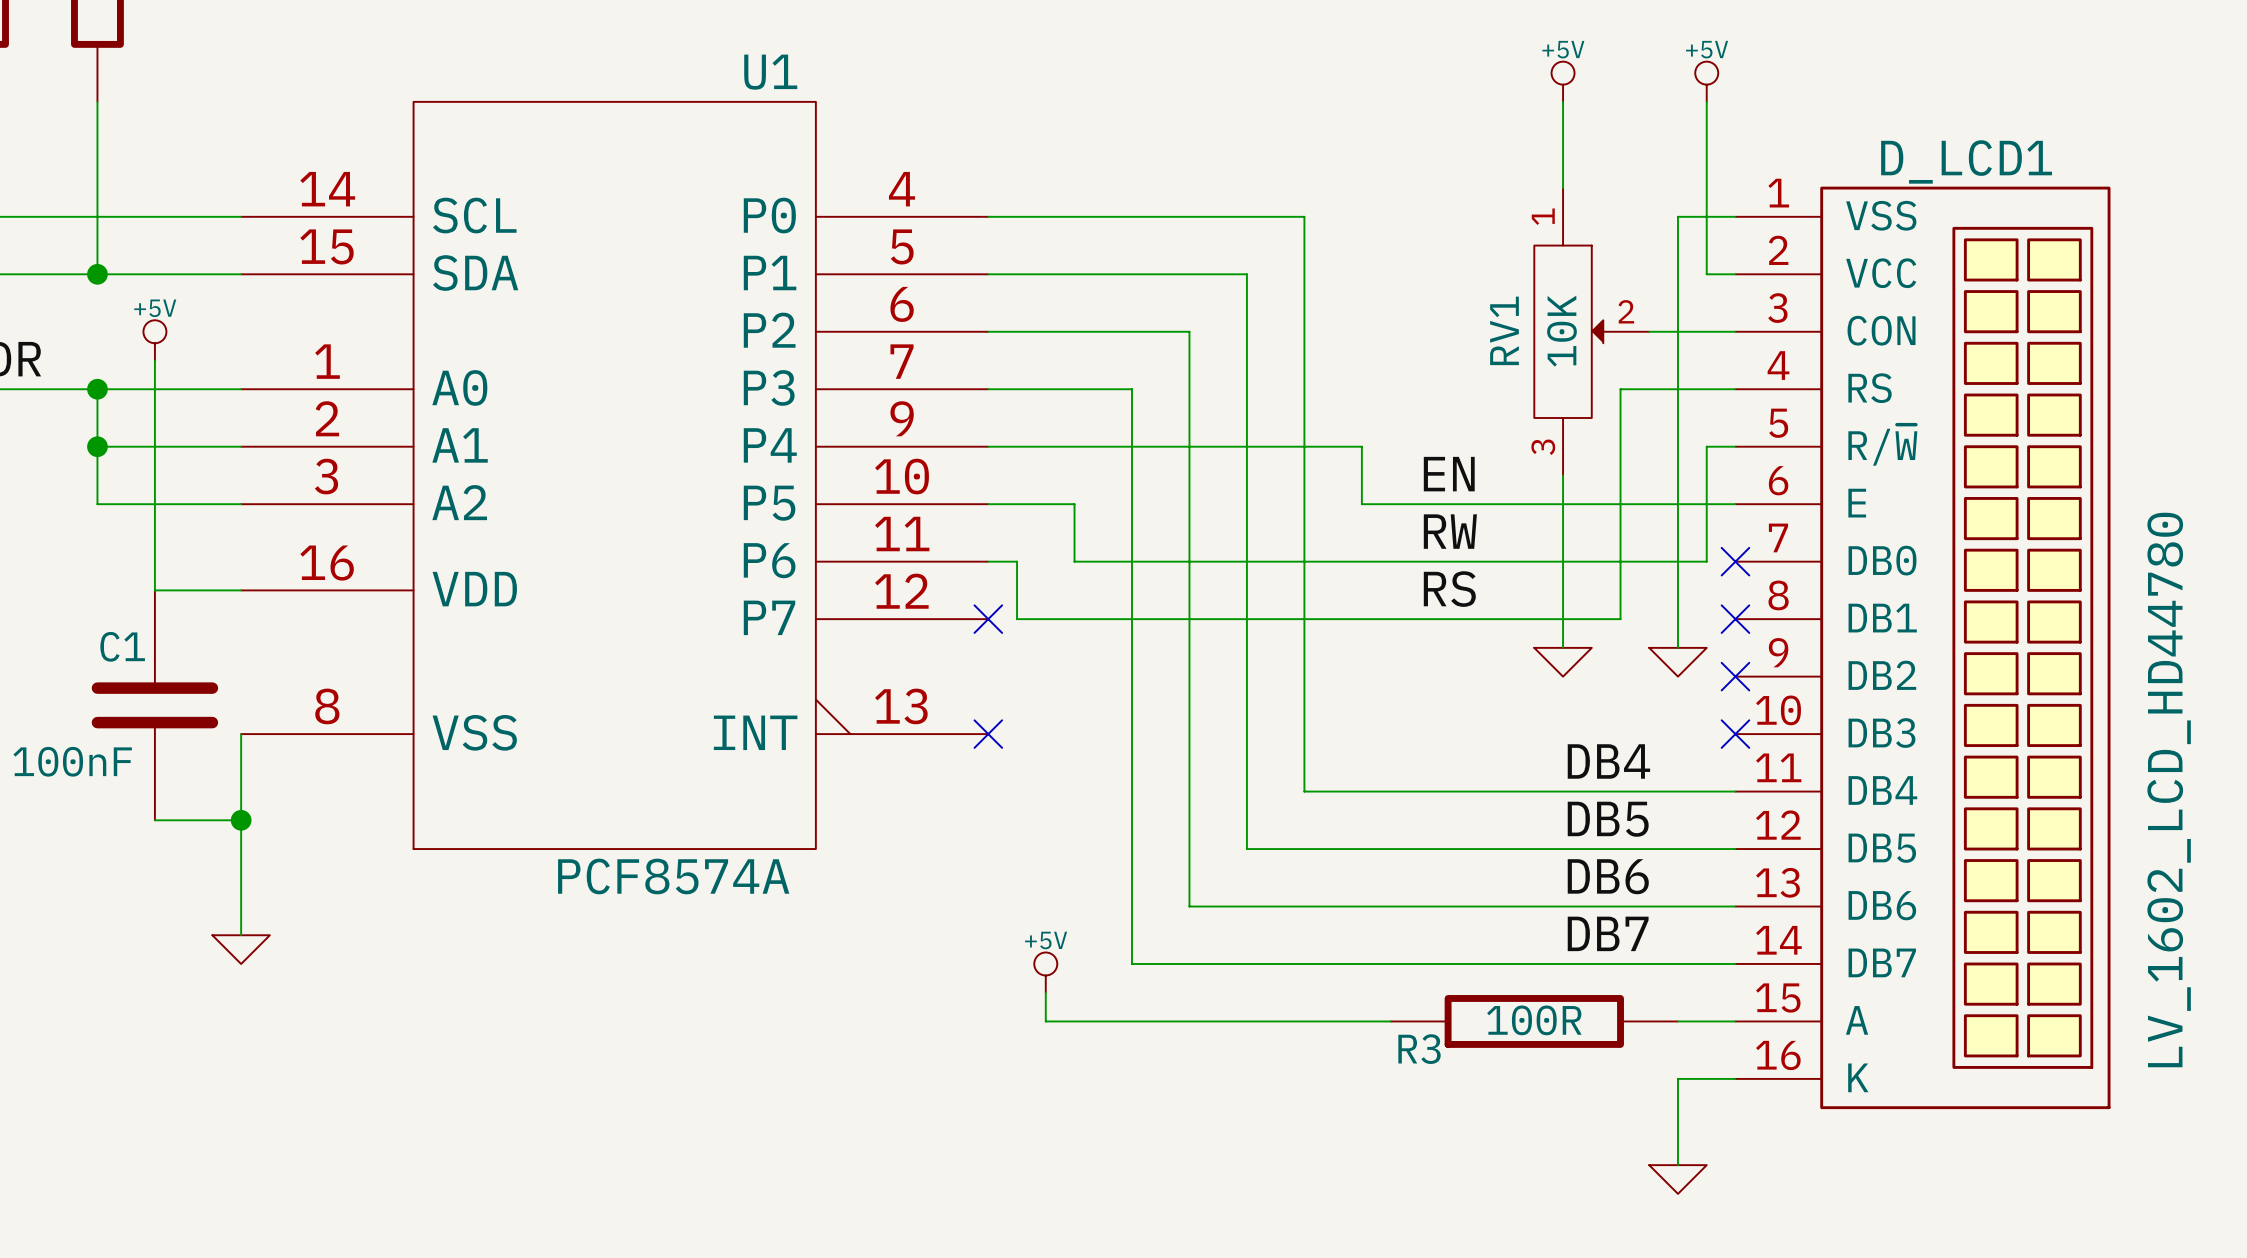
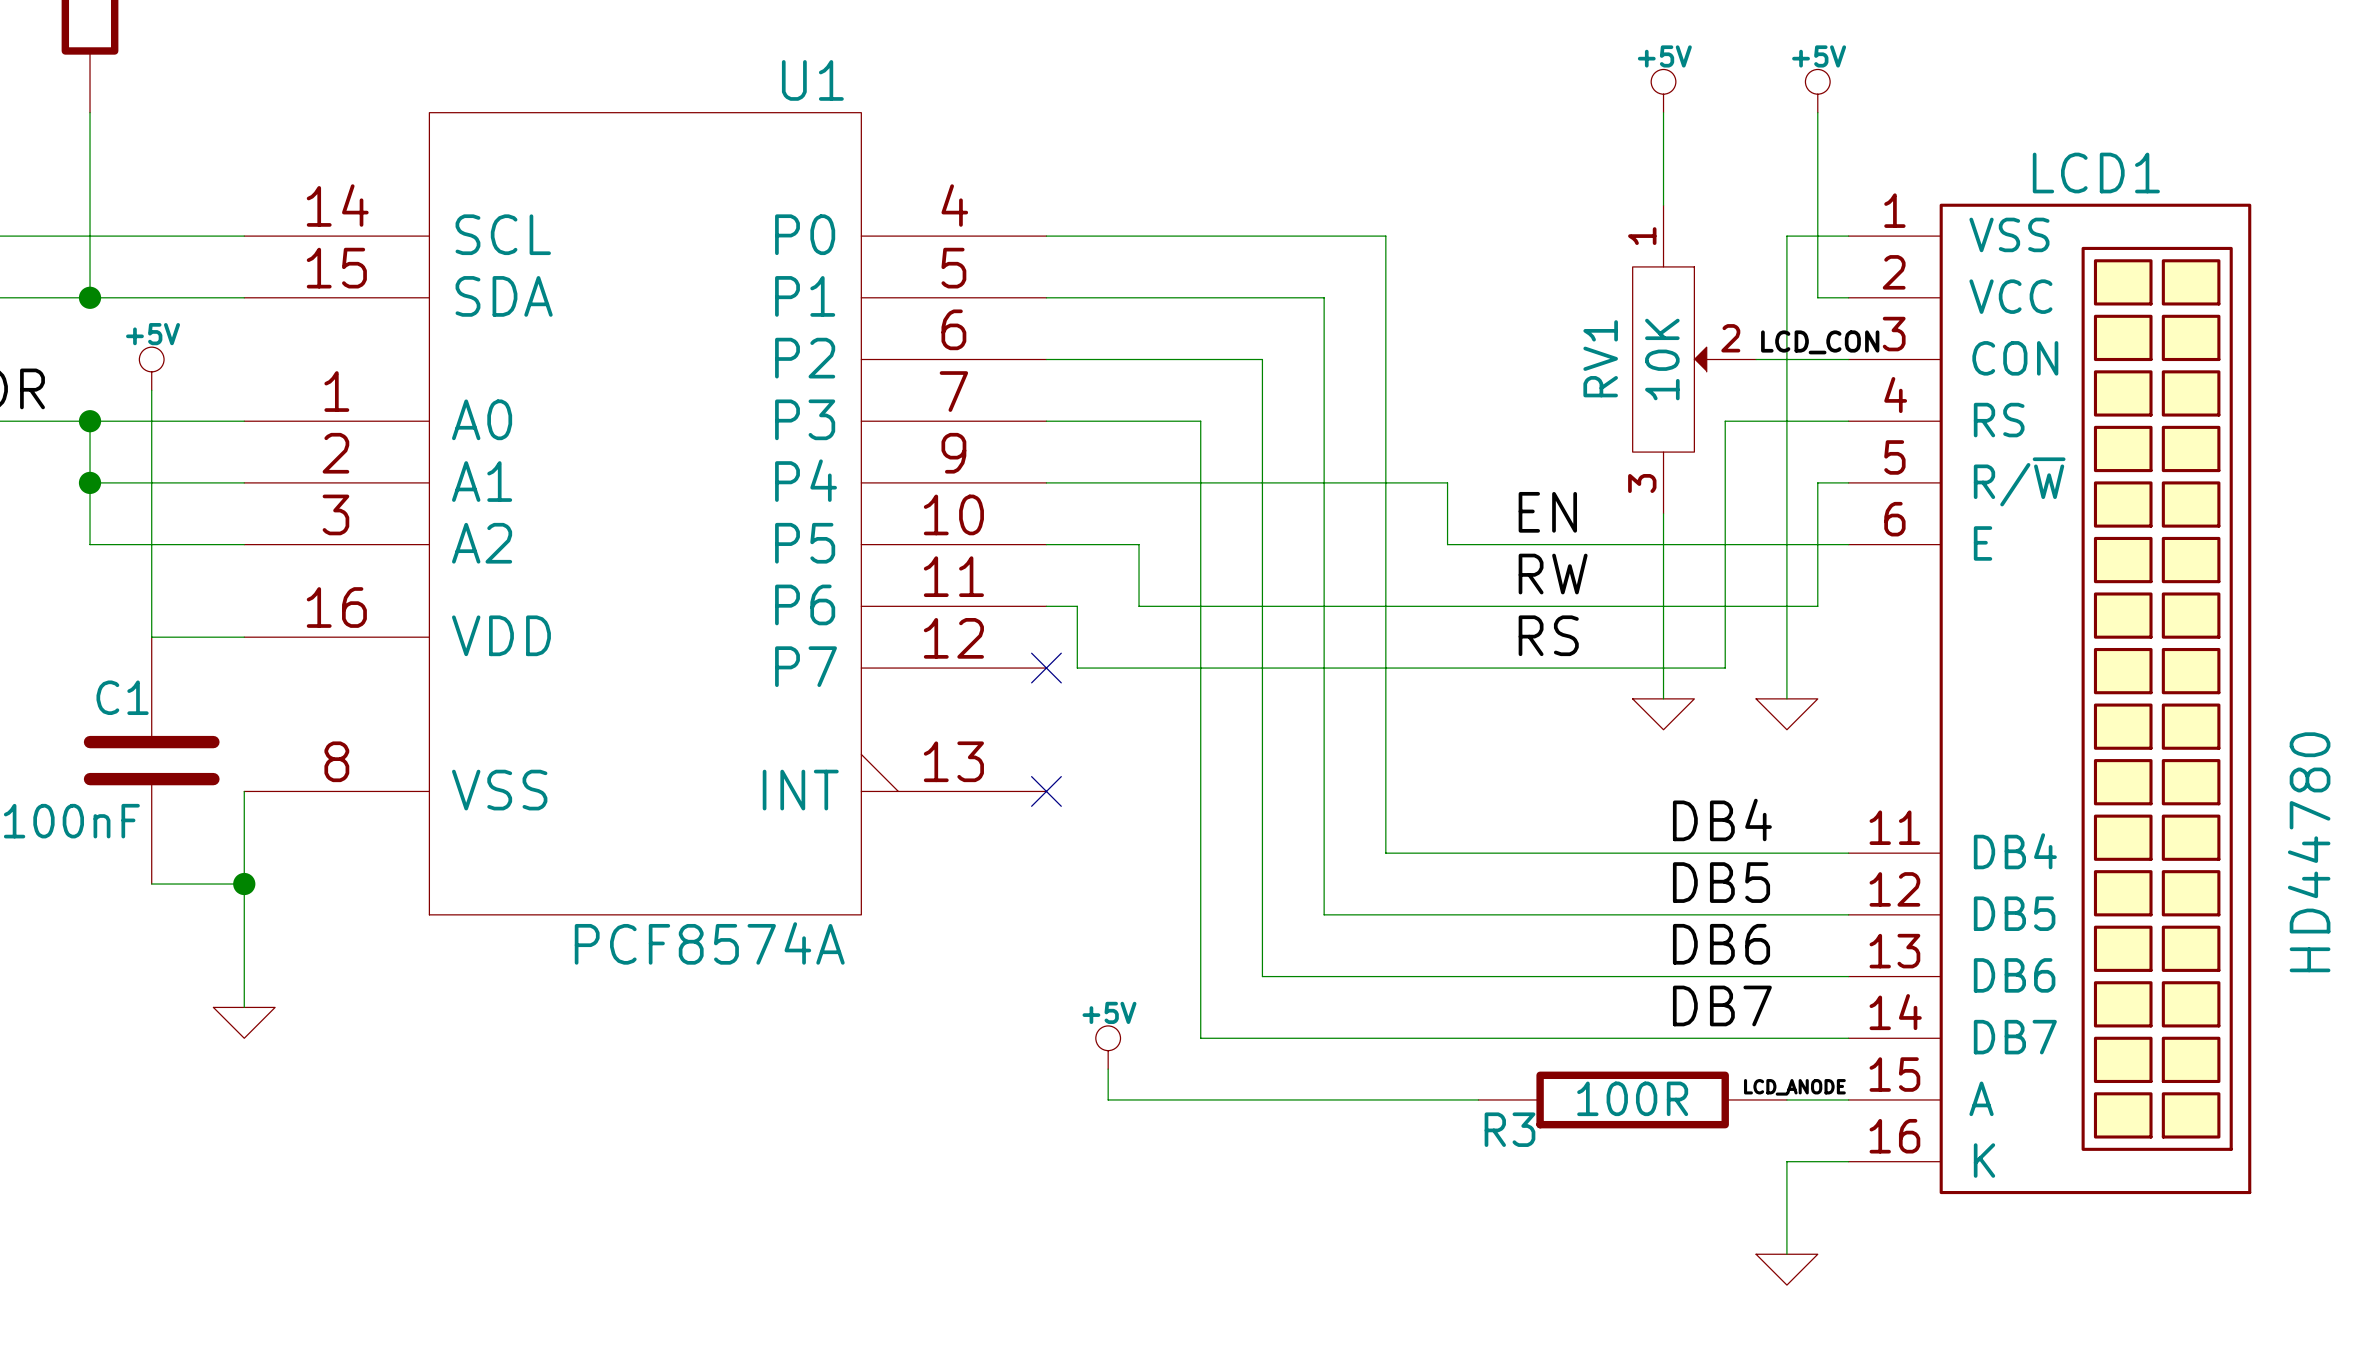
label: none -> LCD_CON (1820, 342)
no-connect mark: (1735, 561) -> none
no-connect mark: (1735, 619) -> none
D_LCD1: LV_1602_LCD_HD44780 (1922, 647) -> none
LCD1: none -> HD44780 (2049, 698)
no-connect mark: (1735, 676) -> none
no-connect mark: (1735, 734) -> none
label: none -> LCD_ANODE (1794, 1087)

